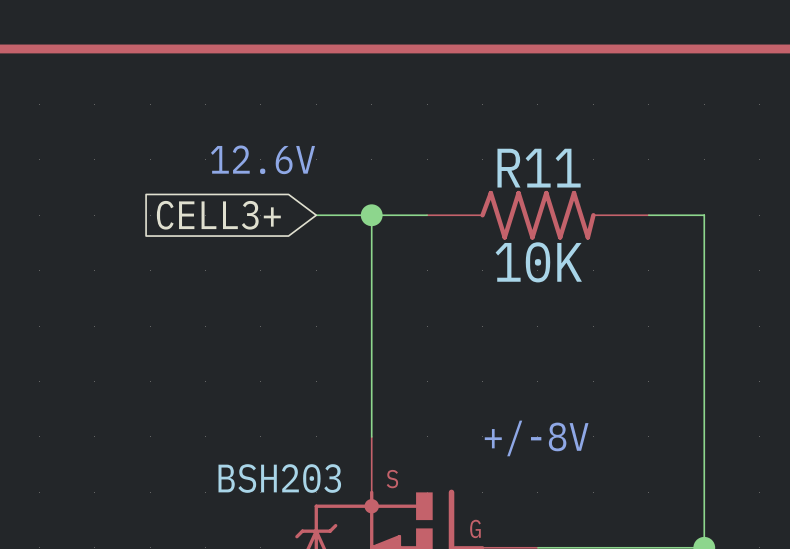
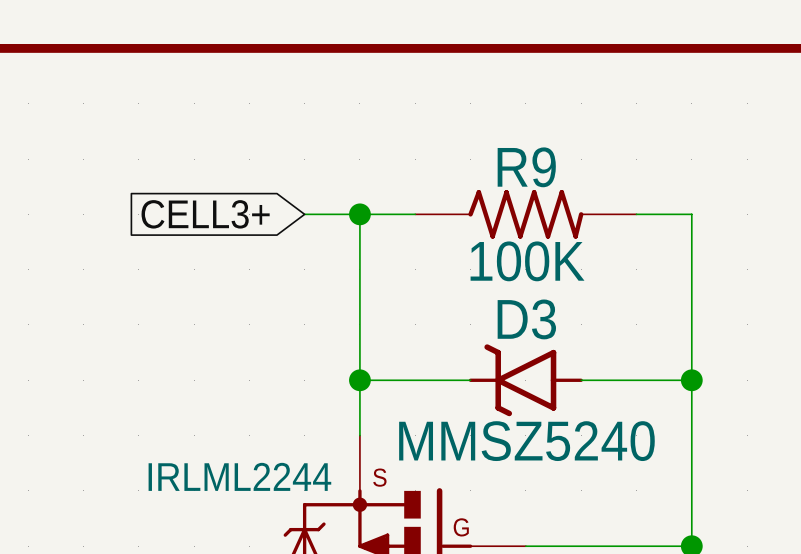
text: 12.6V (262, 159) -> none
R11 name: R11 (539, 168) -> R9 (526, 167)
R11 value: 10K (538, 262) -> 100K (527, 261)
wire: none -> (359, 380) (470, 380)
junction: none -> (359, 380)
D3: none -> MMSZ5240 (525, 380)
wire: none -> (581, 380) (691, 380)
junction: none -> (691, 380)
text: +/-8V (536, 438) -> none
part value: BSH203 (279, 478) -> IRLML2244 (239, 476)

